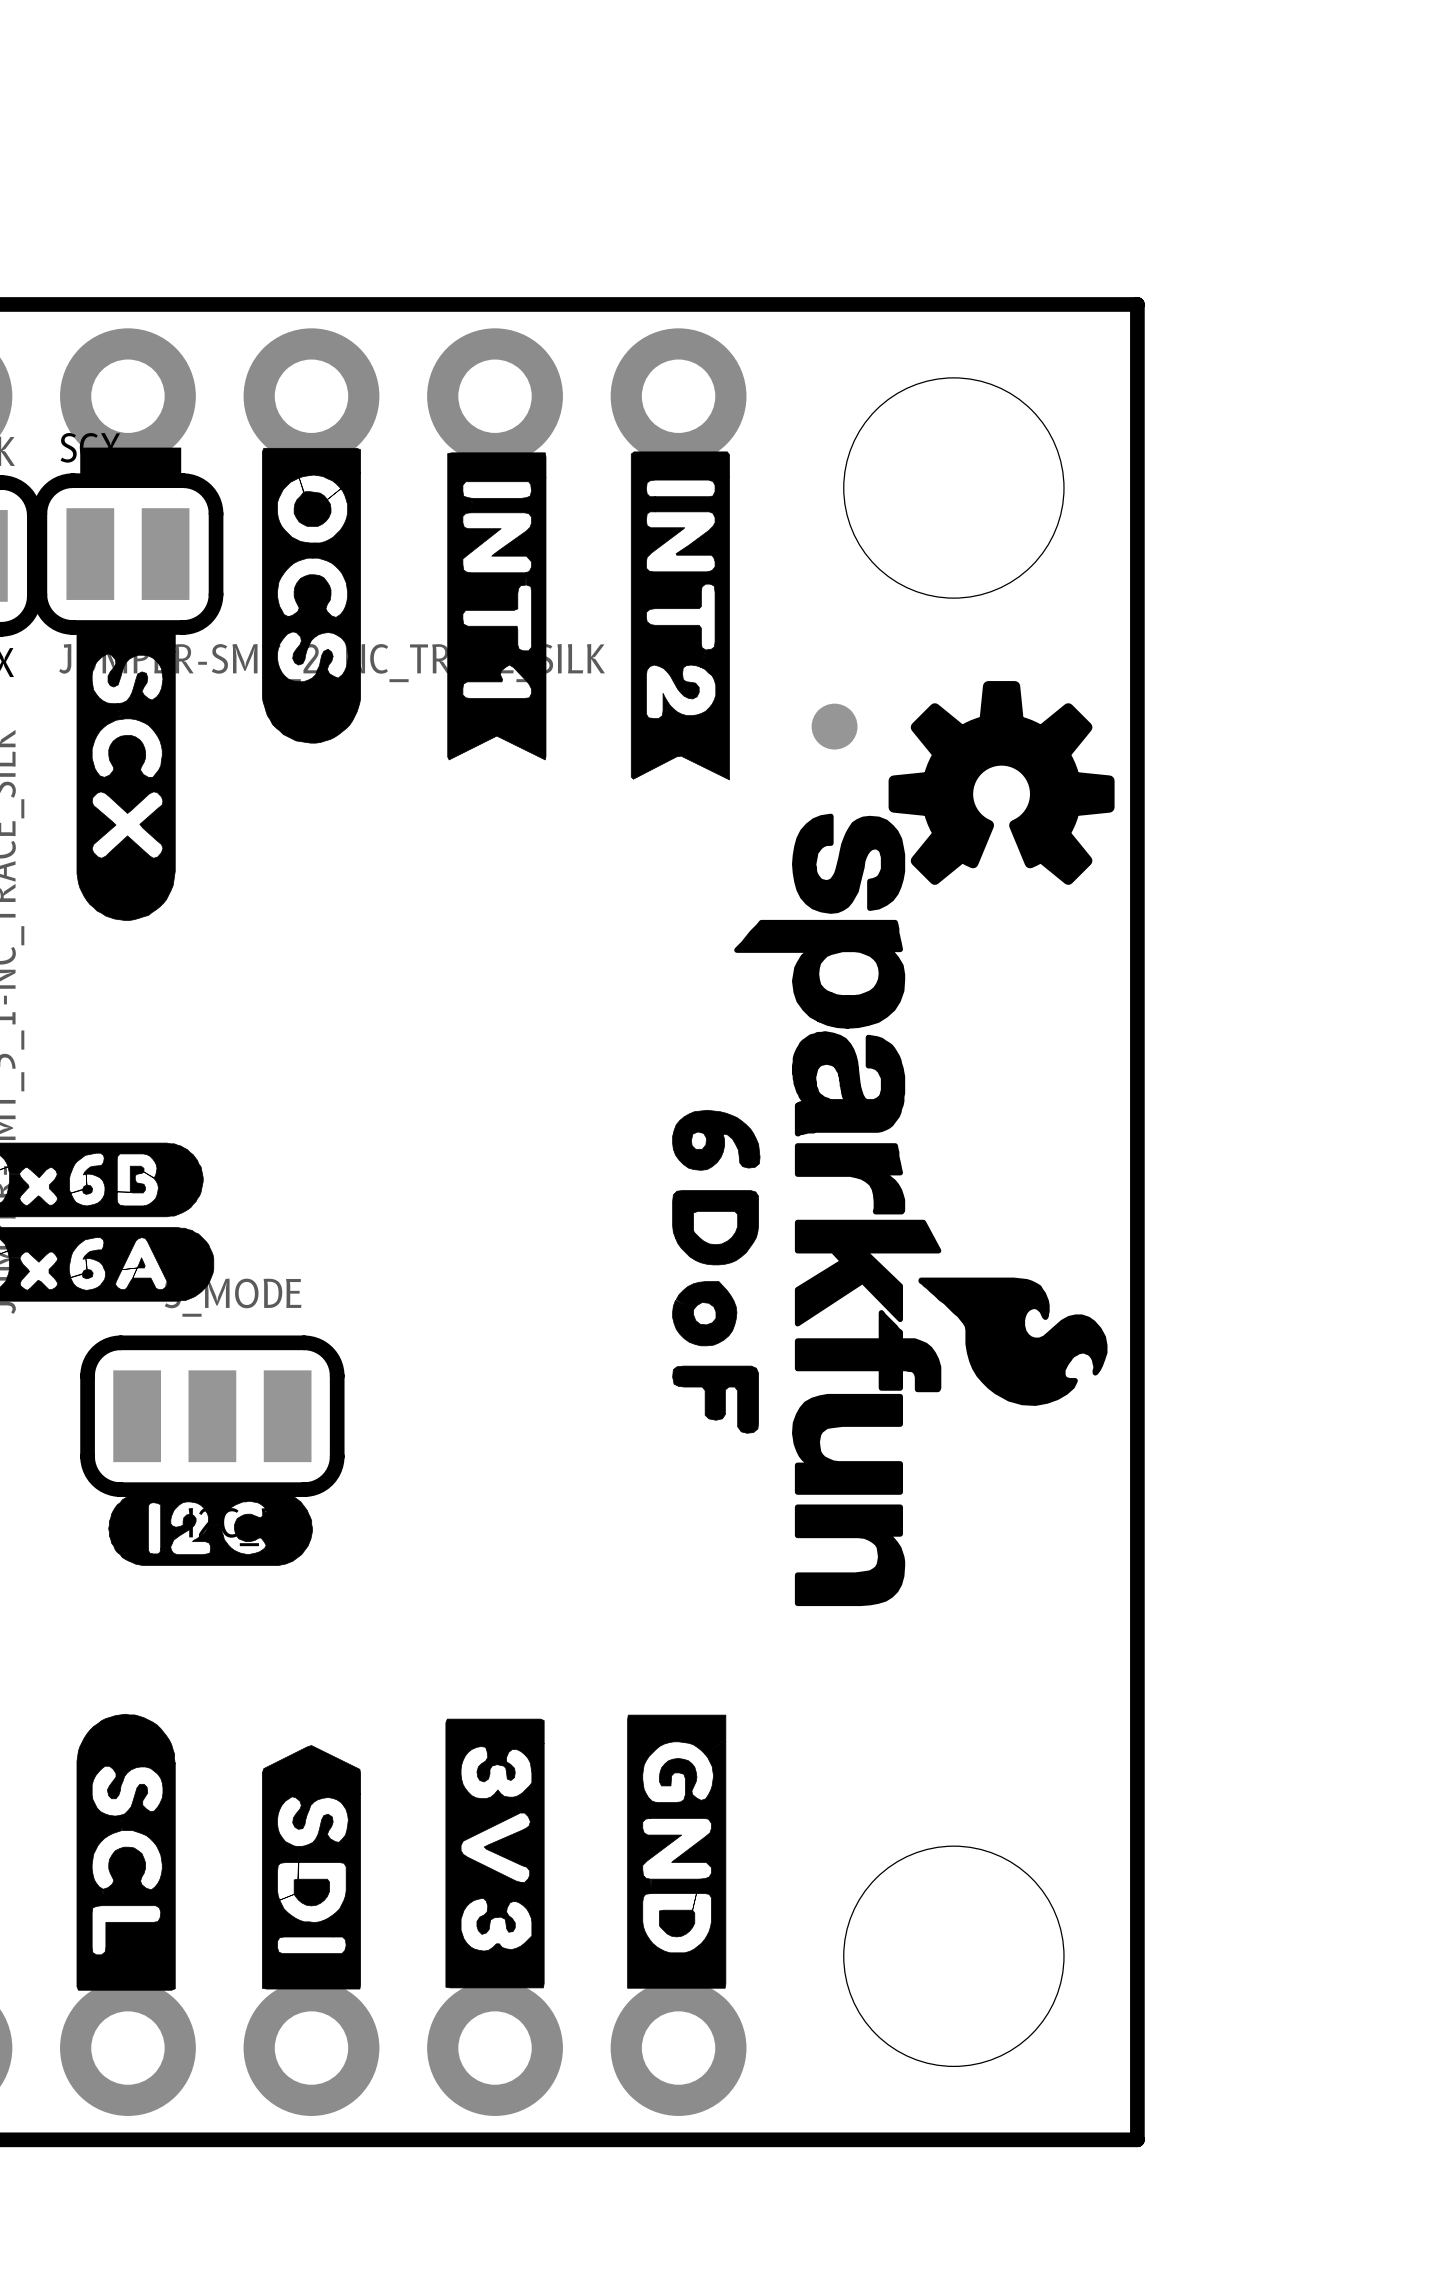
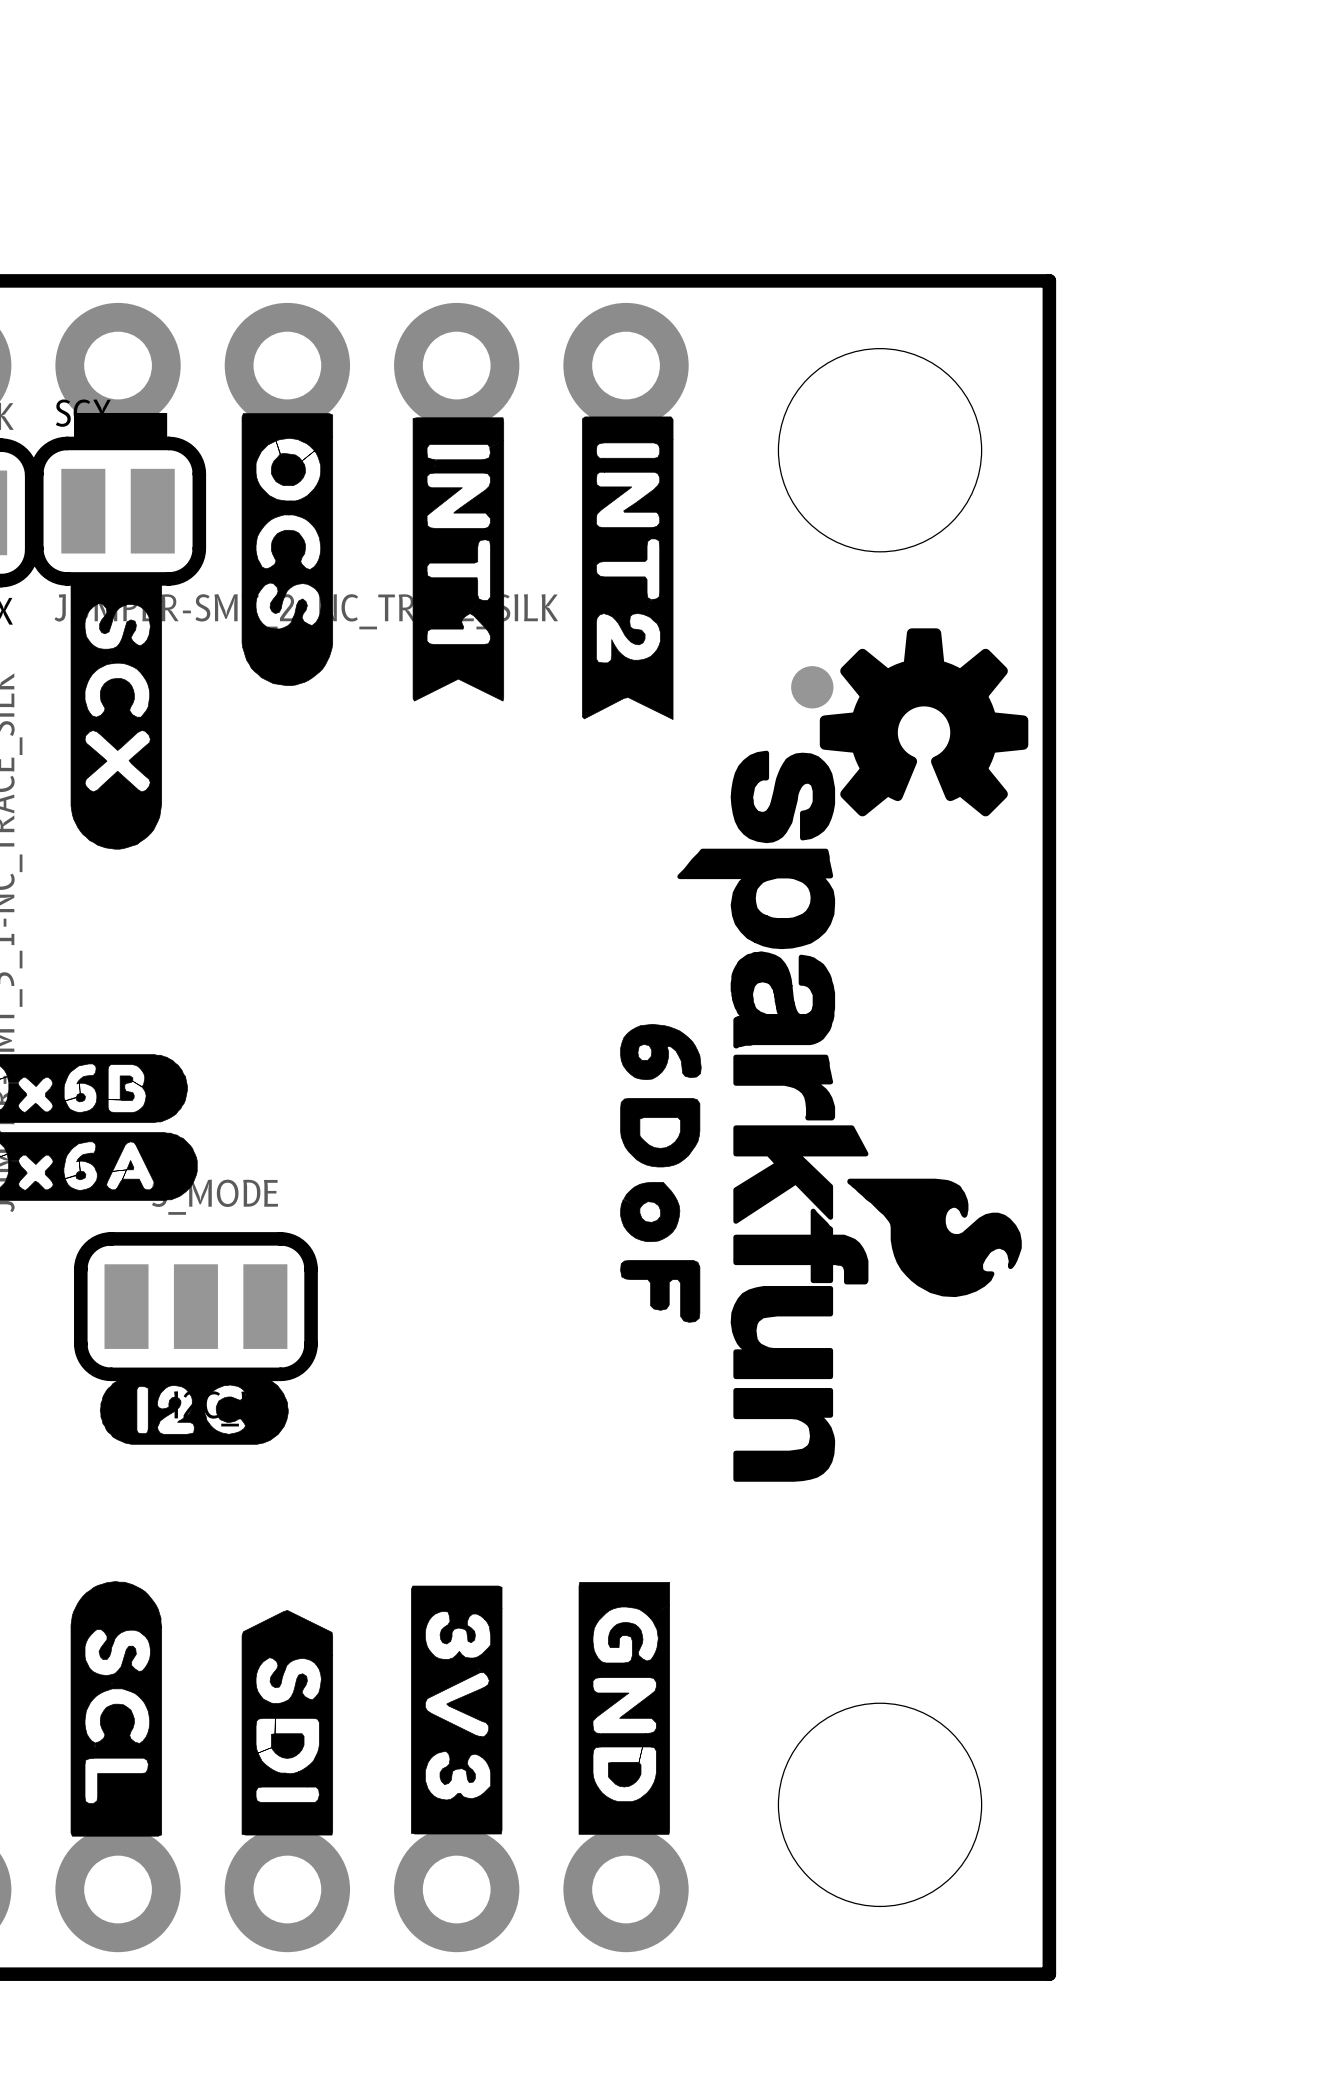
part position: (834, 726) -> (812, 687)

